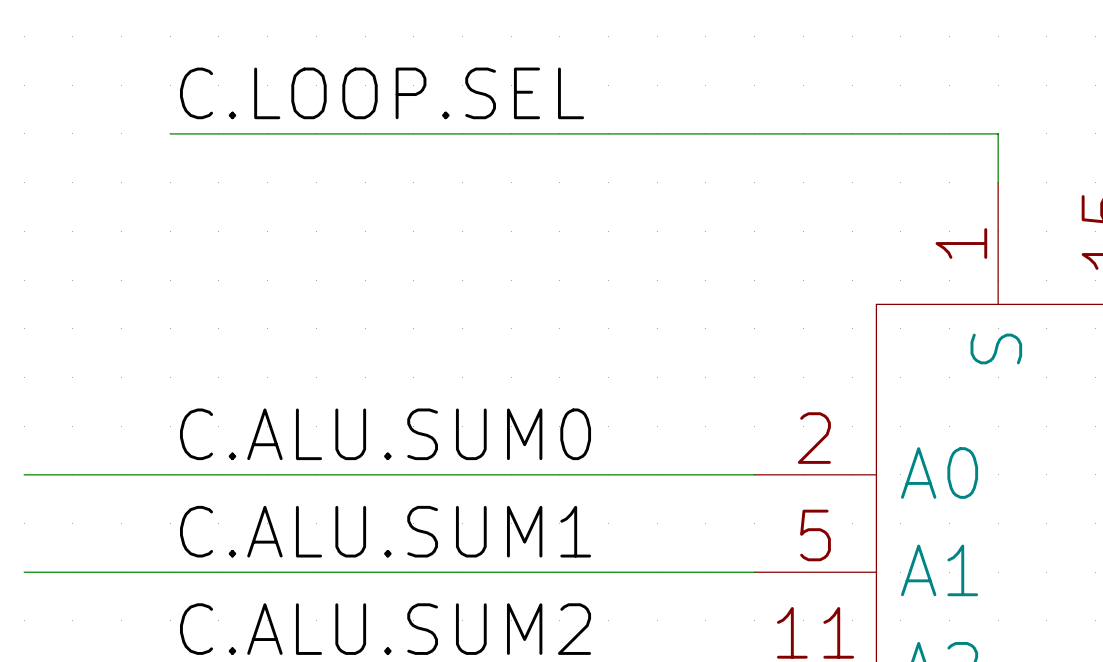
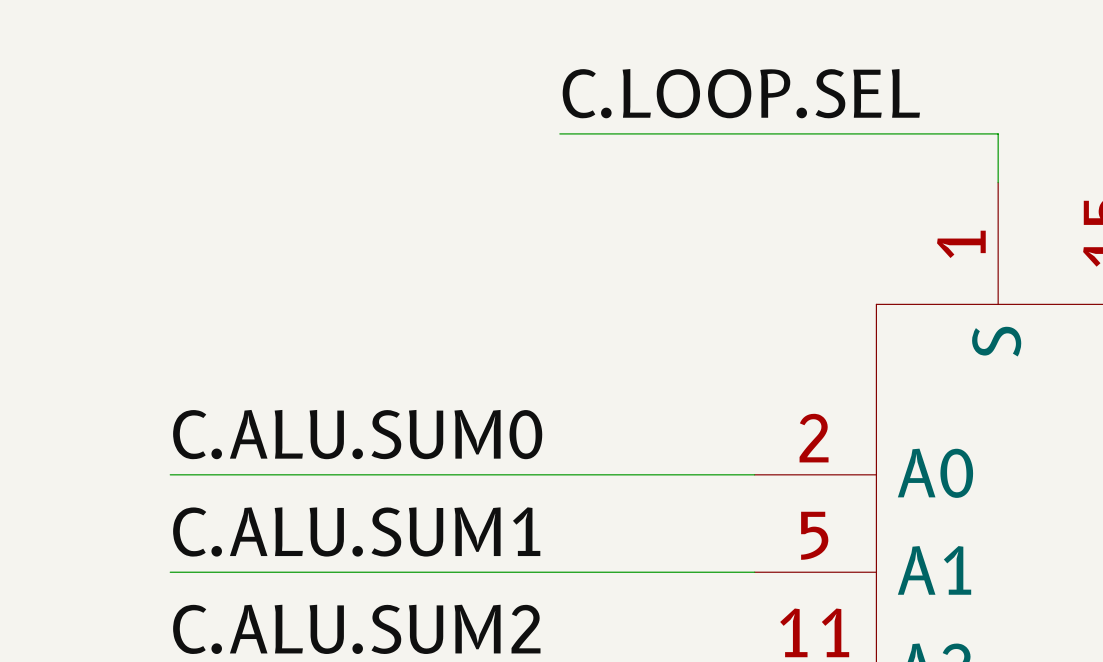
label position: C.LOOP.SEL (382, 93) -> C.LOOP.SEL (741, 93)
wire: (170, 133) (559, 133) -> none
wire: (24, 474) (170, 474) -> none
wire: (24, 572) (170, 572) -> none

